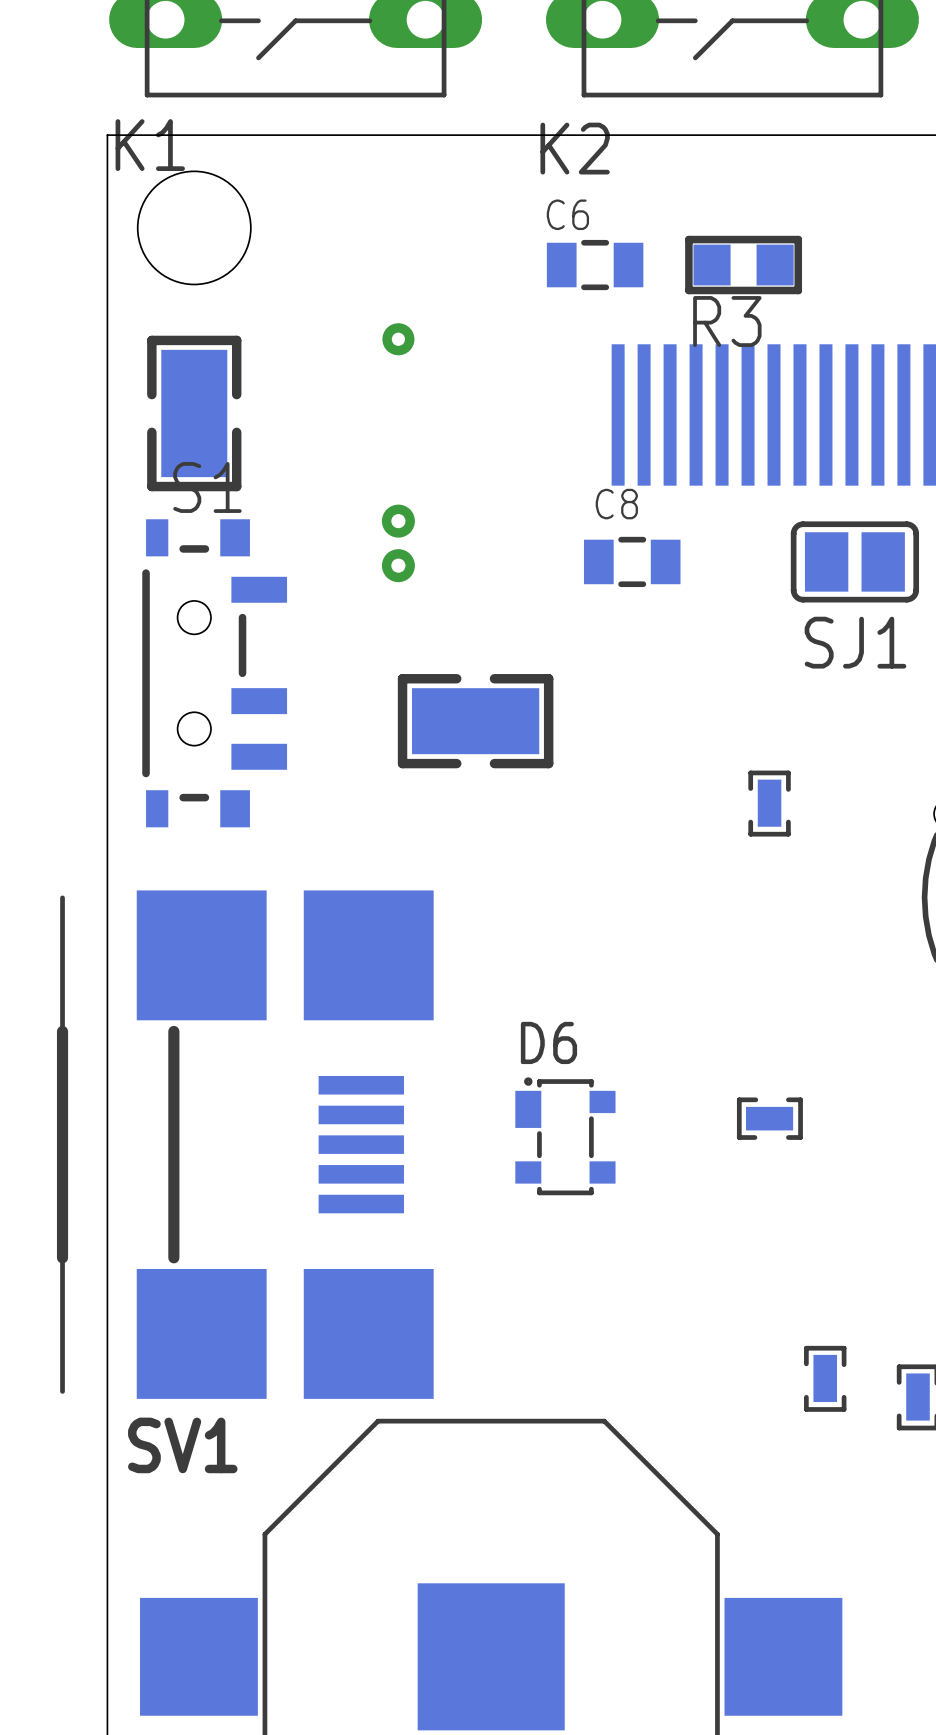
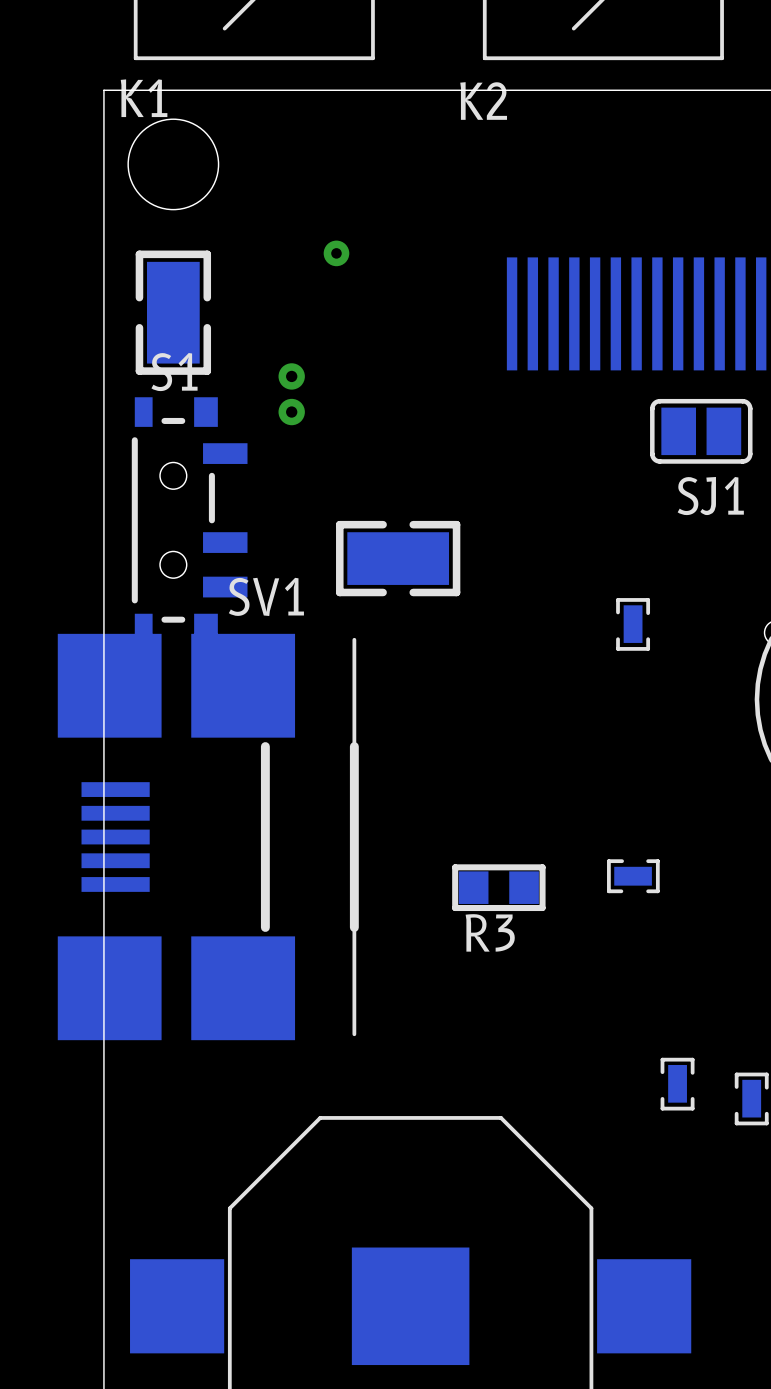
C6: (595, 265) -> none
R3 position: (743, 265) -> (498, 887)
part position: (398, 543) -> (291, 394)
C8: (632, 561) -> none
D6: (565, 1136) -> none
SV1 rotation: 0° (245, 1144) -> 180° (208, 837)

